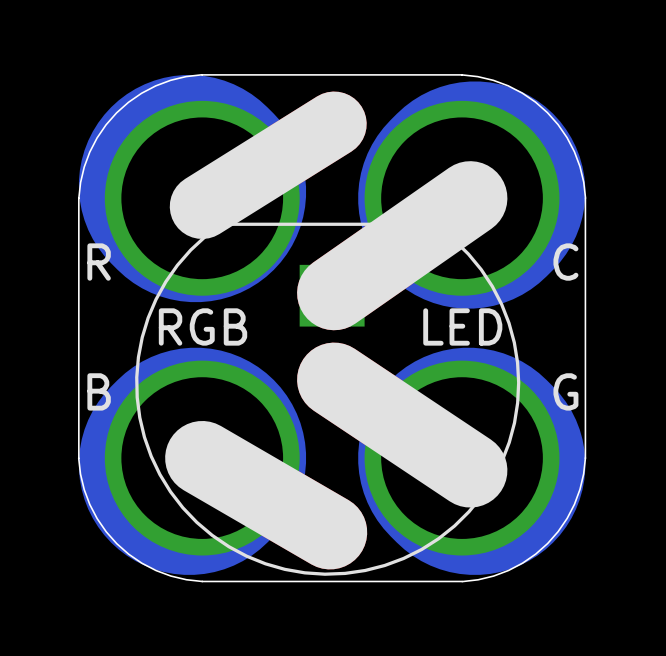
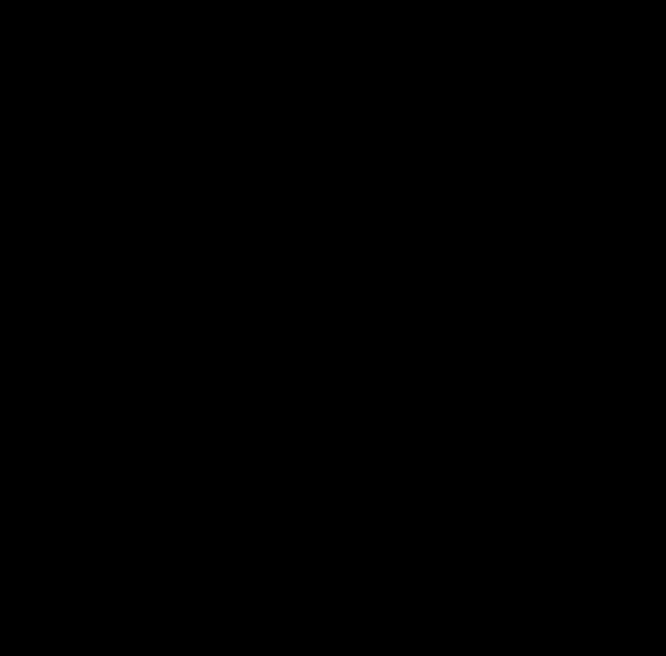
part: RGB (332, 328) -> none

